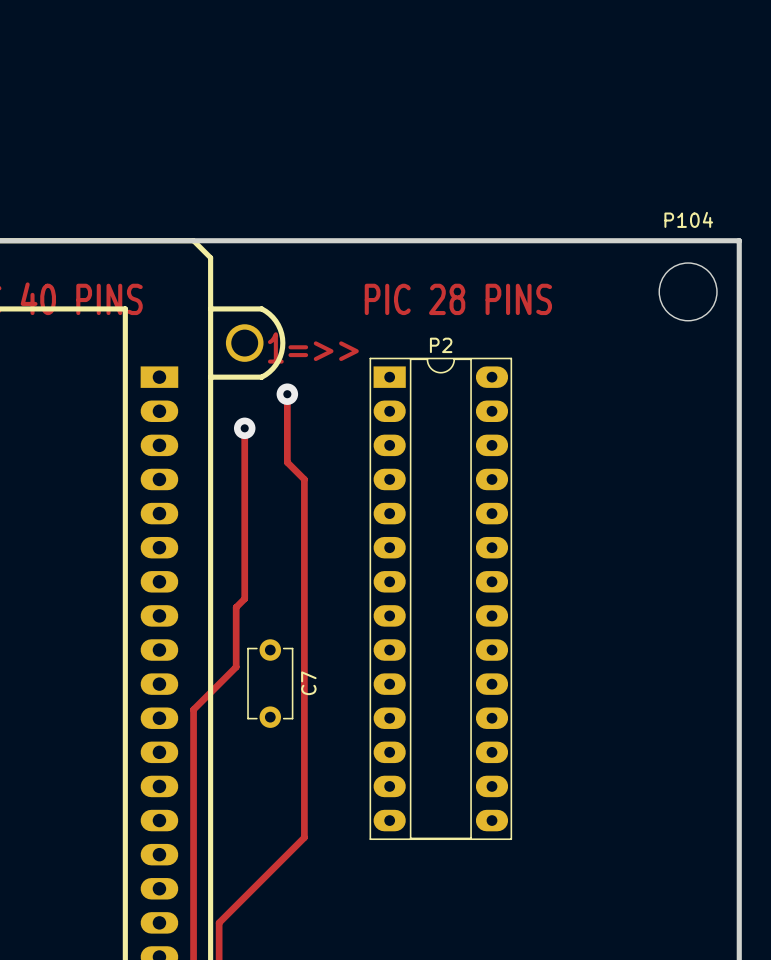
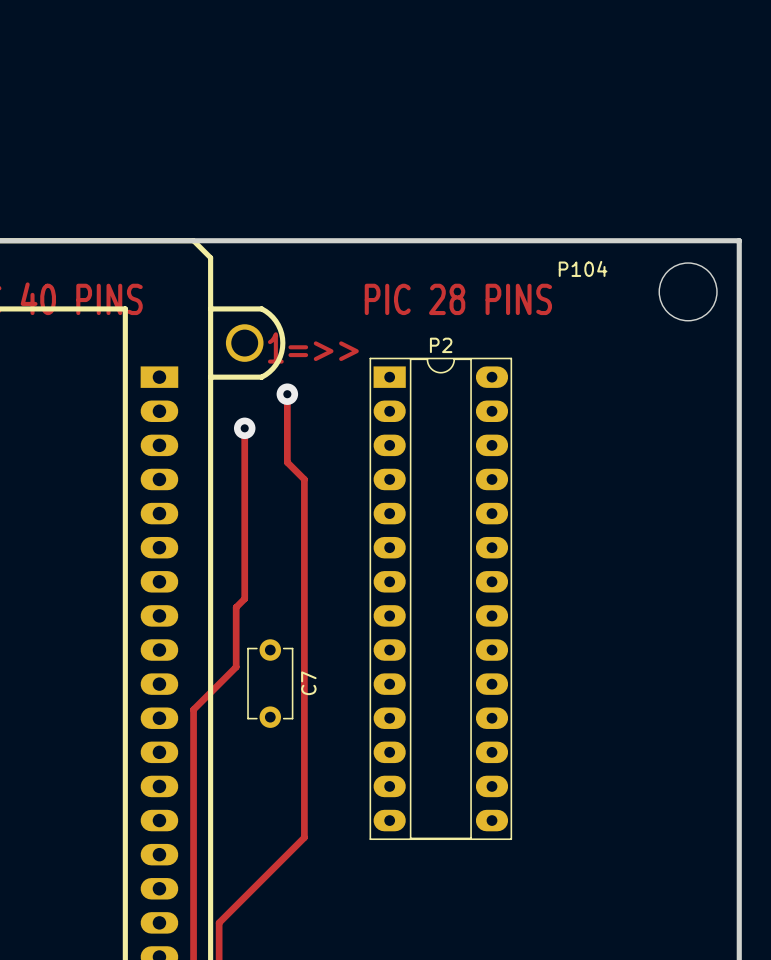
P104 name position: P104 (688, 219) -> P104 (583, 268)

